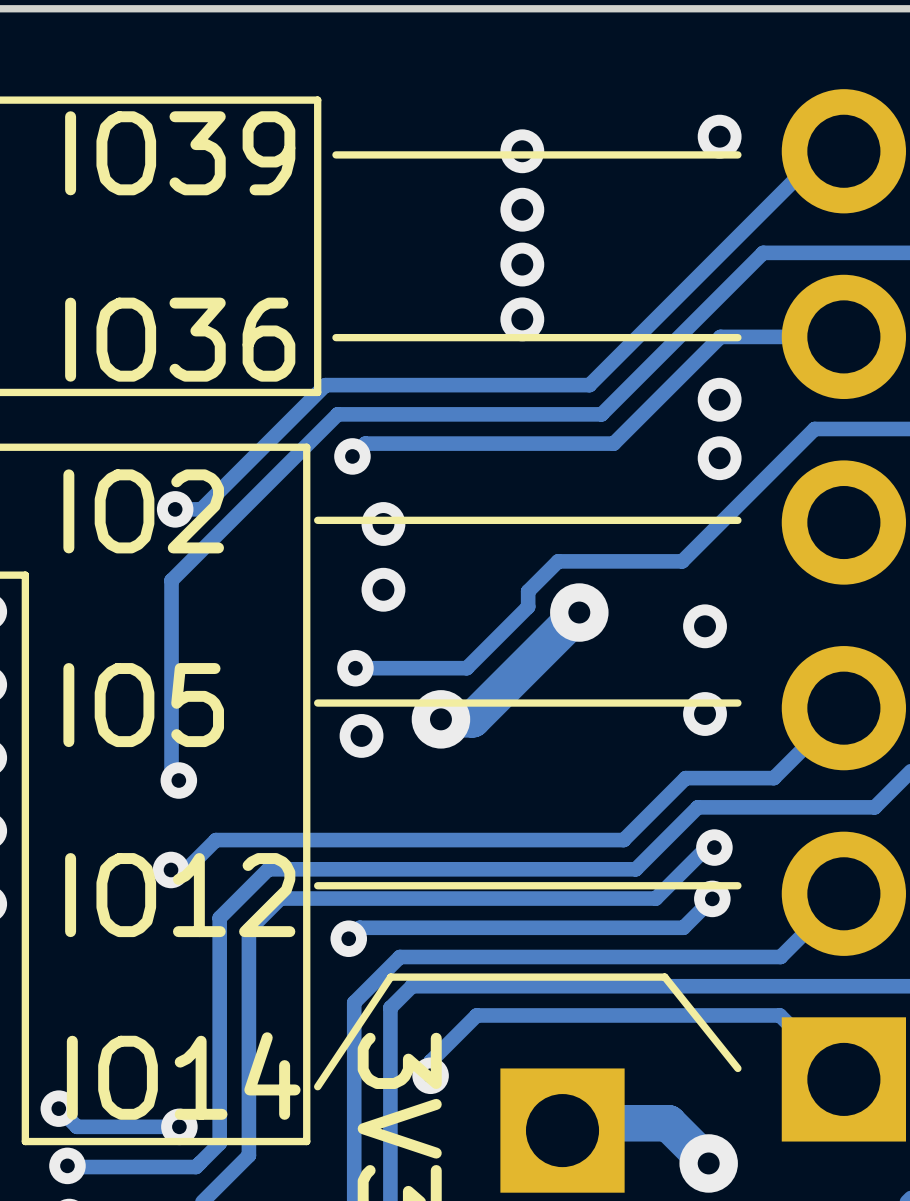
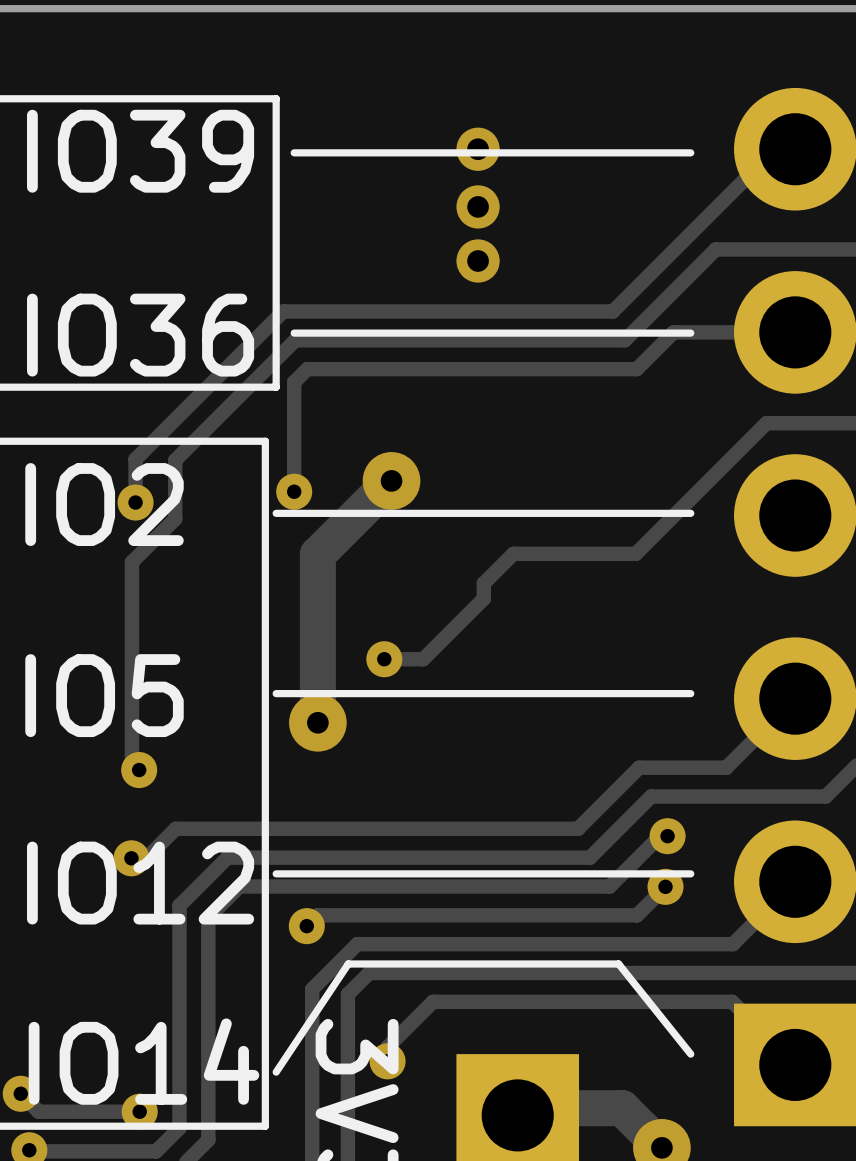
via: (719, 136) -> none
track: (658, 315) (589, 385) (325, 385) (201, 509) (175, 509) -> (612, 311) (283, 311) (135, 459) (135, 502)
via: (522, 319) -> none
track: (671, 344) (601, 414) (337, 414) (171, 580) -> (624, 340) (295, 340) (175, 460) (175, 518) (131, 562) (131, 572)
track: (683, 374) (613, 443) (365, 443) (352, 456) -> (636, 369) (307, 369) (294, 382) (294, 491)
via: (719, 399) -> none
via position: (352, 456) -> (294, 491)
via: (719, 458) -> none
track: none -> (391, 480) (317, 554) (317, 722)
via position: (383, 523) -> (391, 480)
via: (383, 589) -> none
track: (579, 612) (472, 719) (440, 719) -> none
via: (579, 612) -> none
via: (705, 626) -> none
via position: (355, 668) -> (384, 659)
track: (427, 668) (355, 668) -> none
via: (705, 714) -> none
via position: (440, 719) -> (317, 722)
via: (361, 735) -> none

